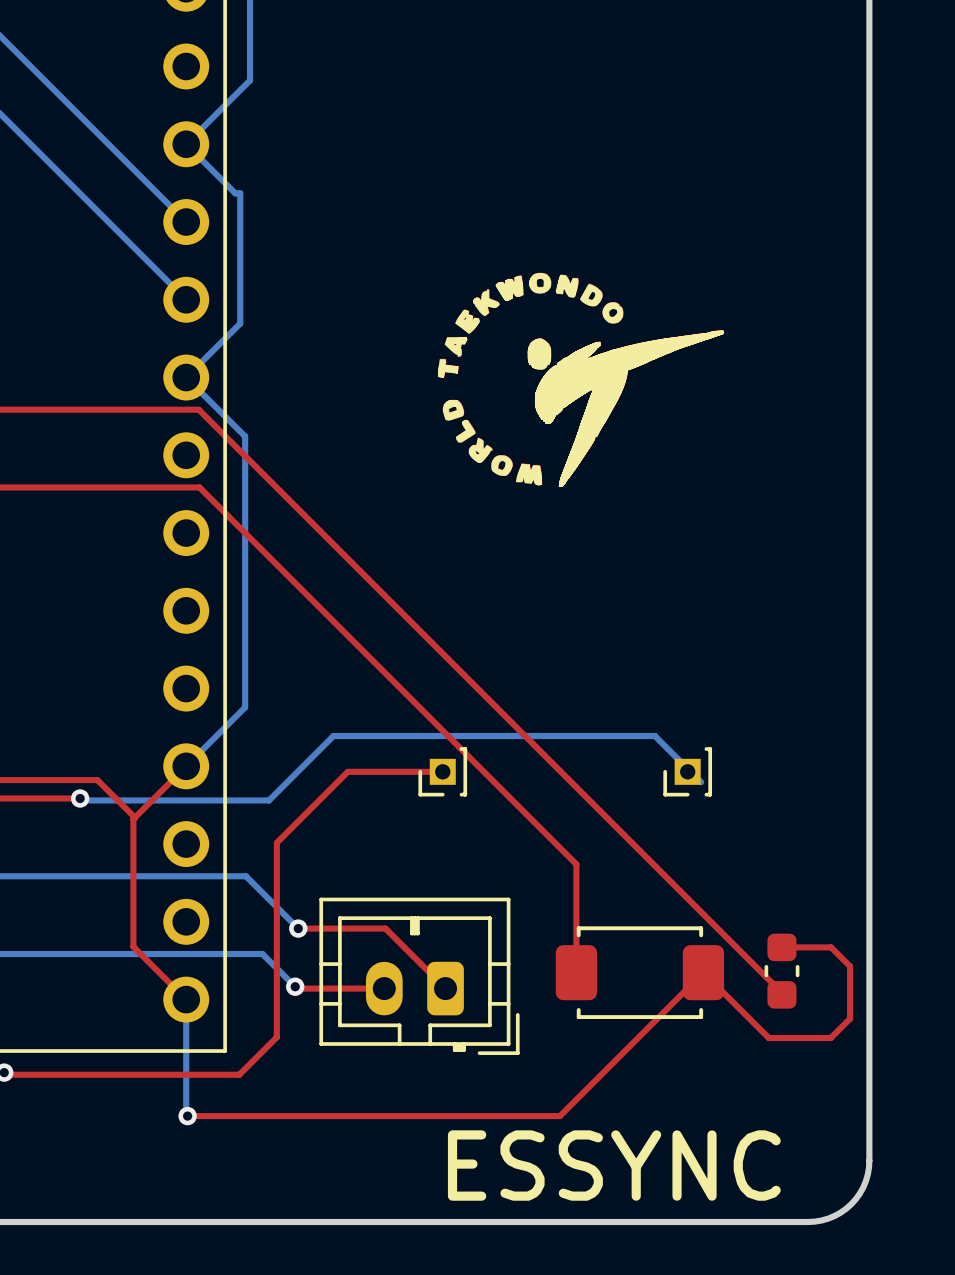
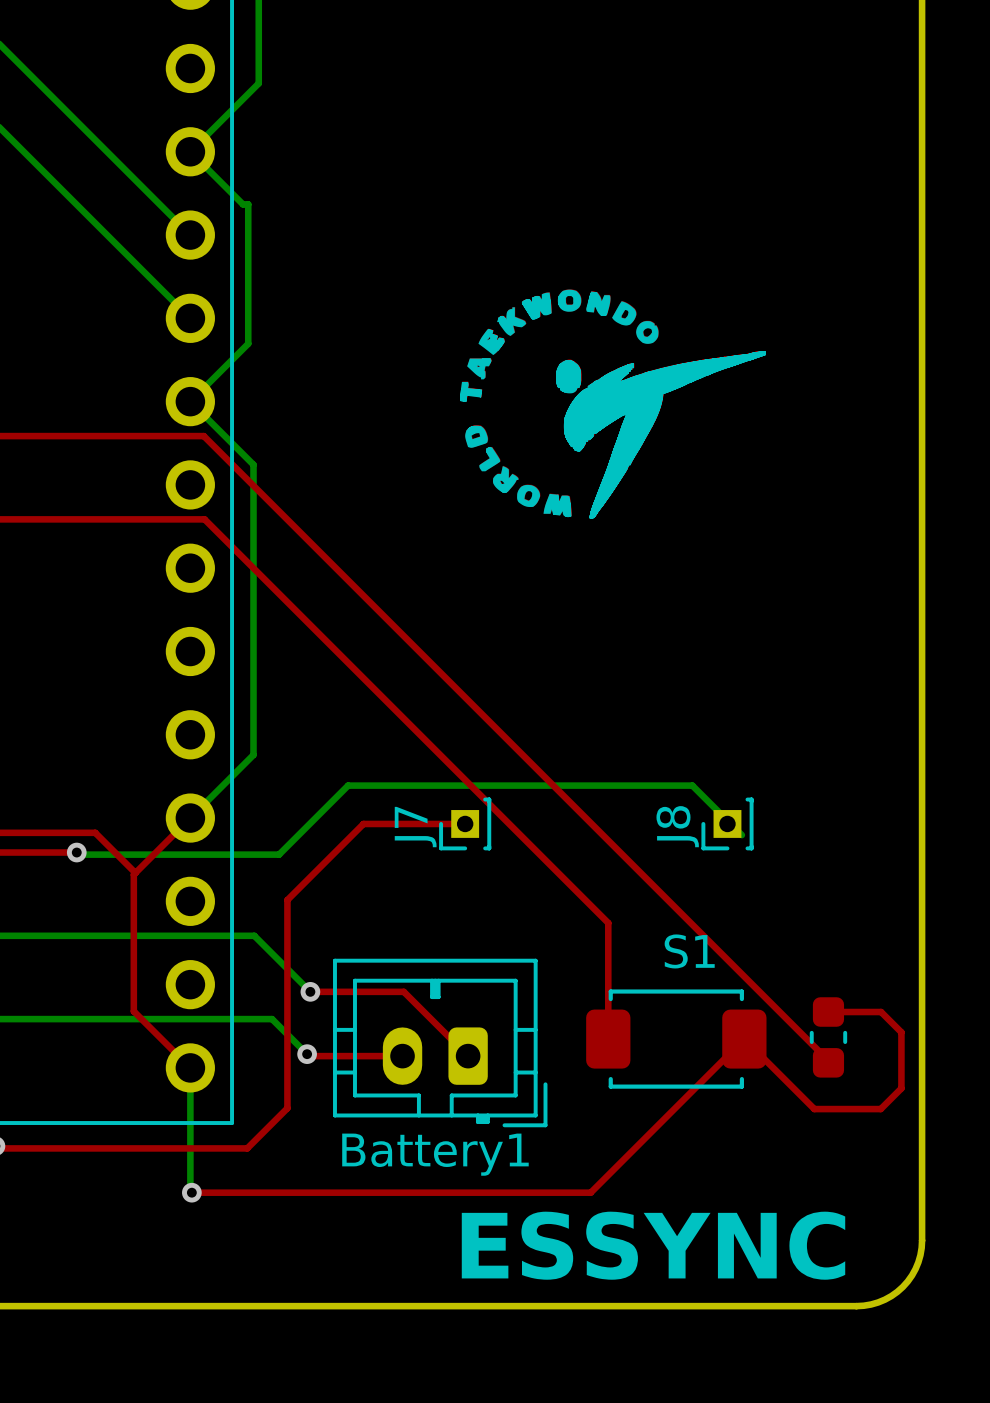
J7 name: none -> J7 (415, 827)
J8 name: none -> J8 (677, 826)
S1 name: none -> S1 (689, 951)
Battery1 name: none -> Battery1 (435, 1154)

